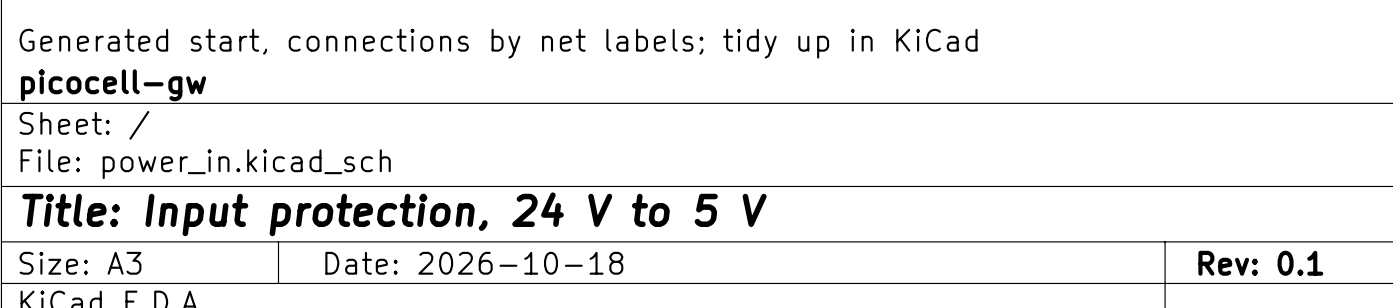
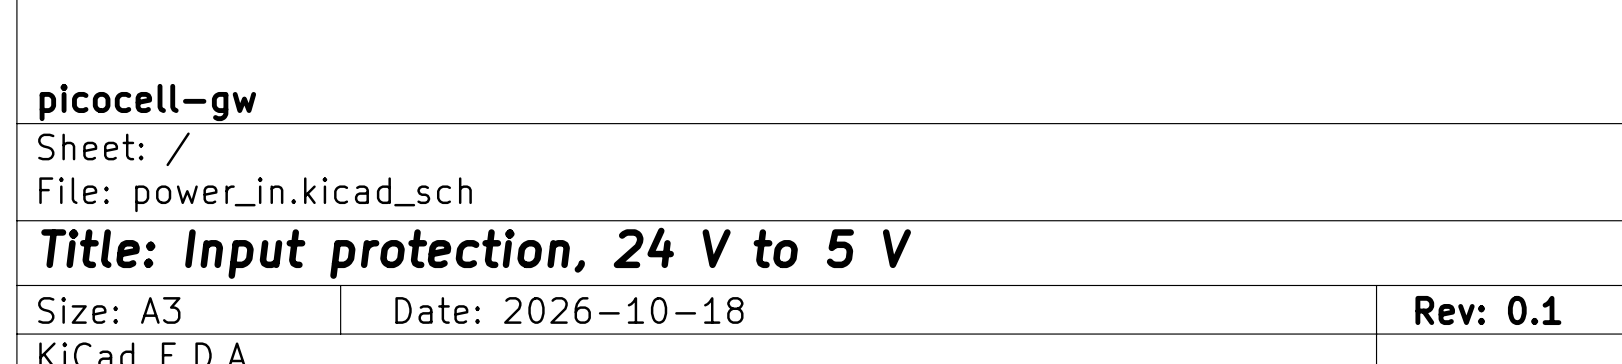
title block: Generated start, connections by net labels; tidy up in KiCad (498, 43) -> none

